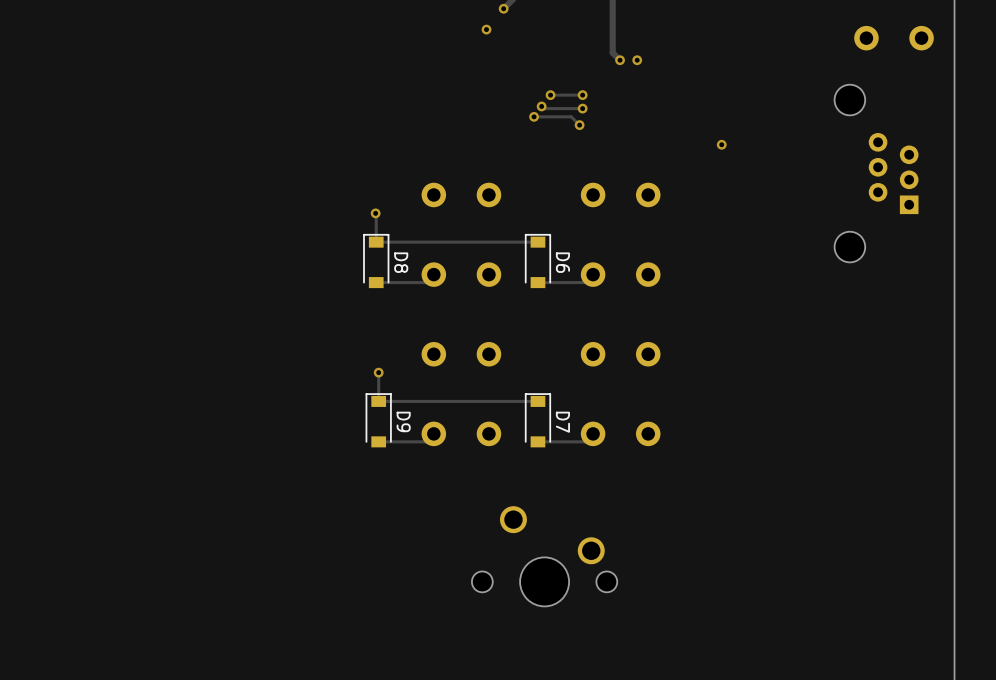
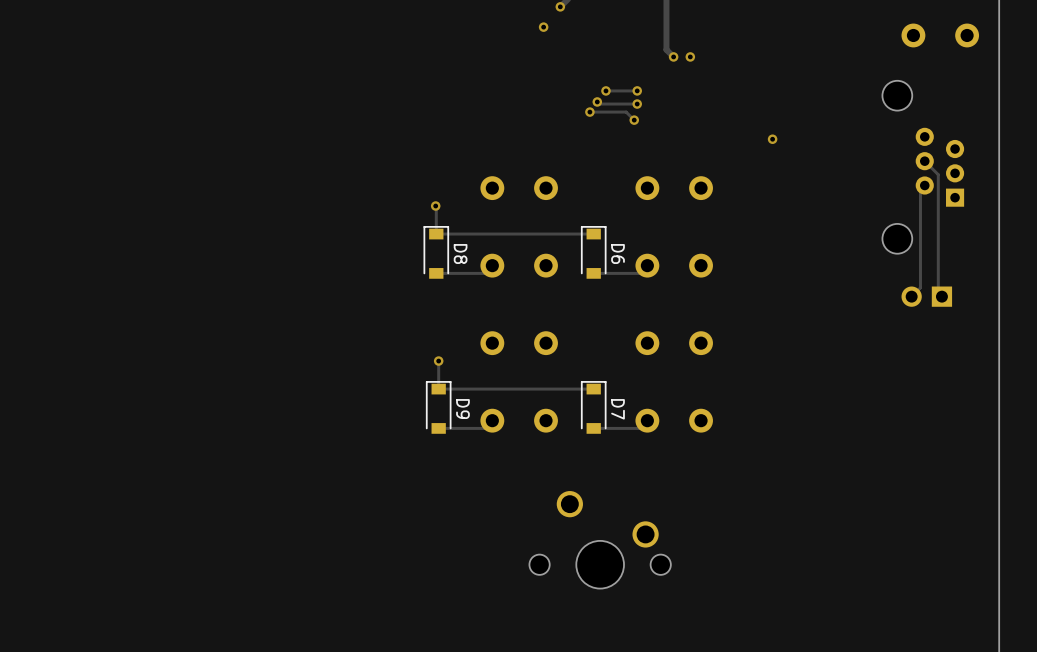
track: none -> (924, 161) (938, 174) (938, 293) (941, 296)
track: none -> (924, 185) (920, 189) (920, 287) (911, 296)
part: none -> (926, 296)

